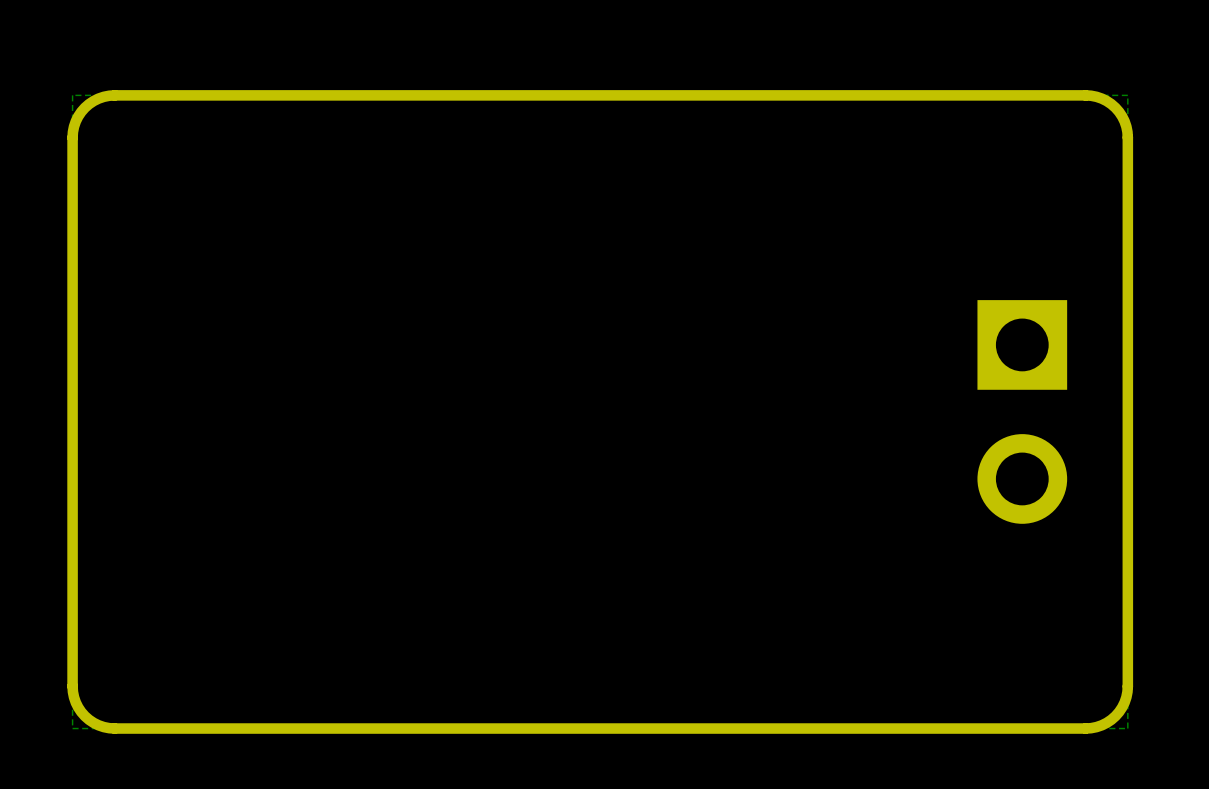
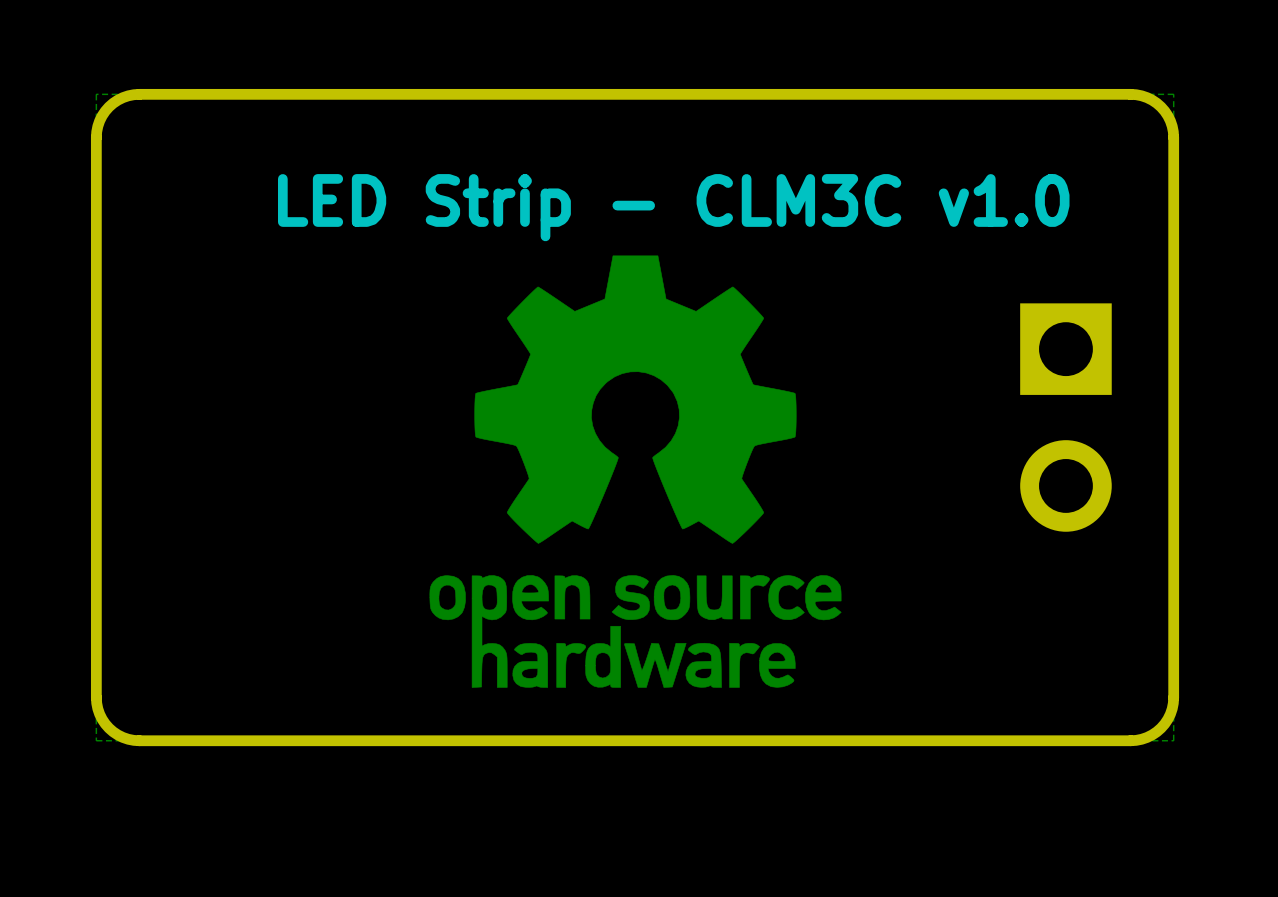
text: none -> LED Strip - CLM3C v1.0 (673, 207)
drawing: none -> [429, 255, 842, 688]

